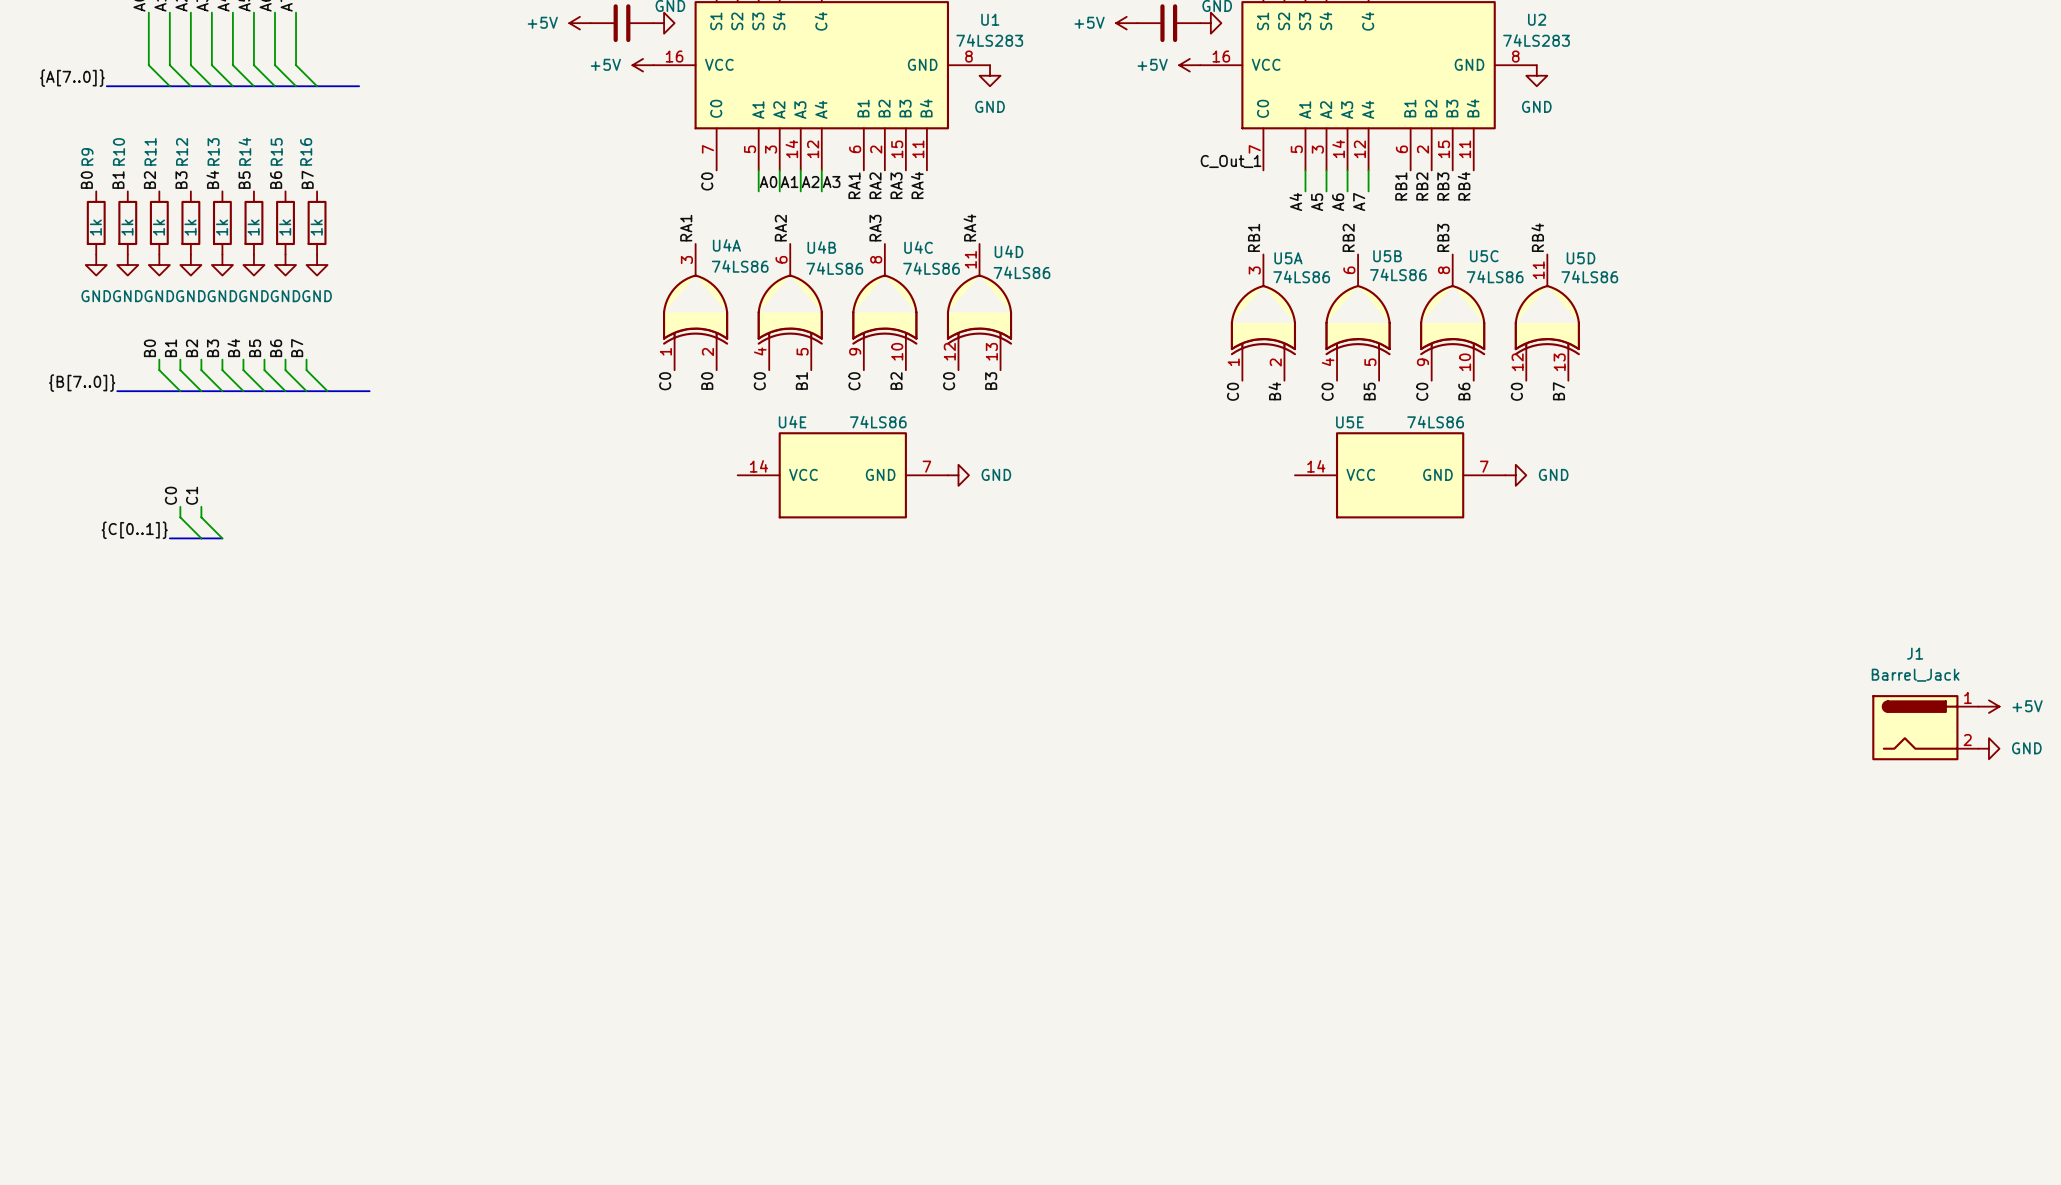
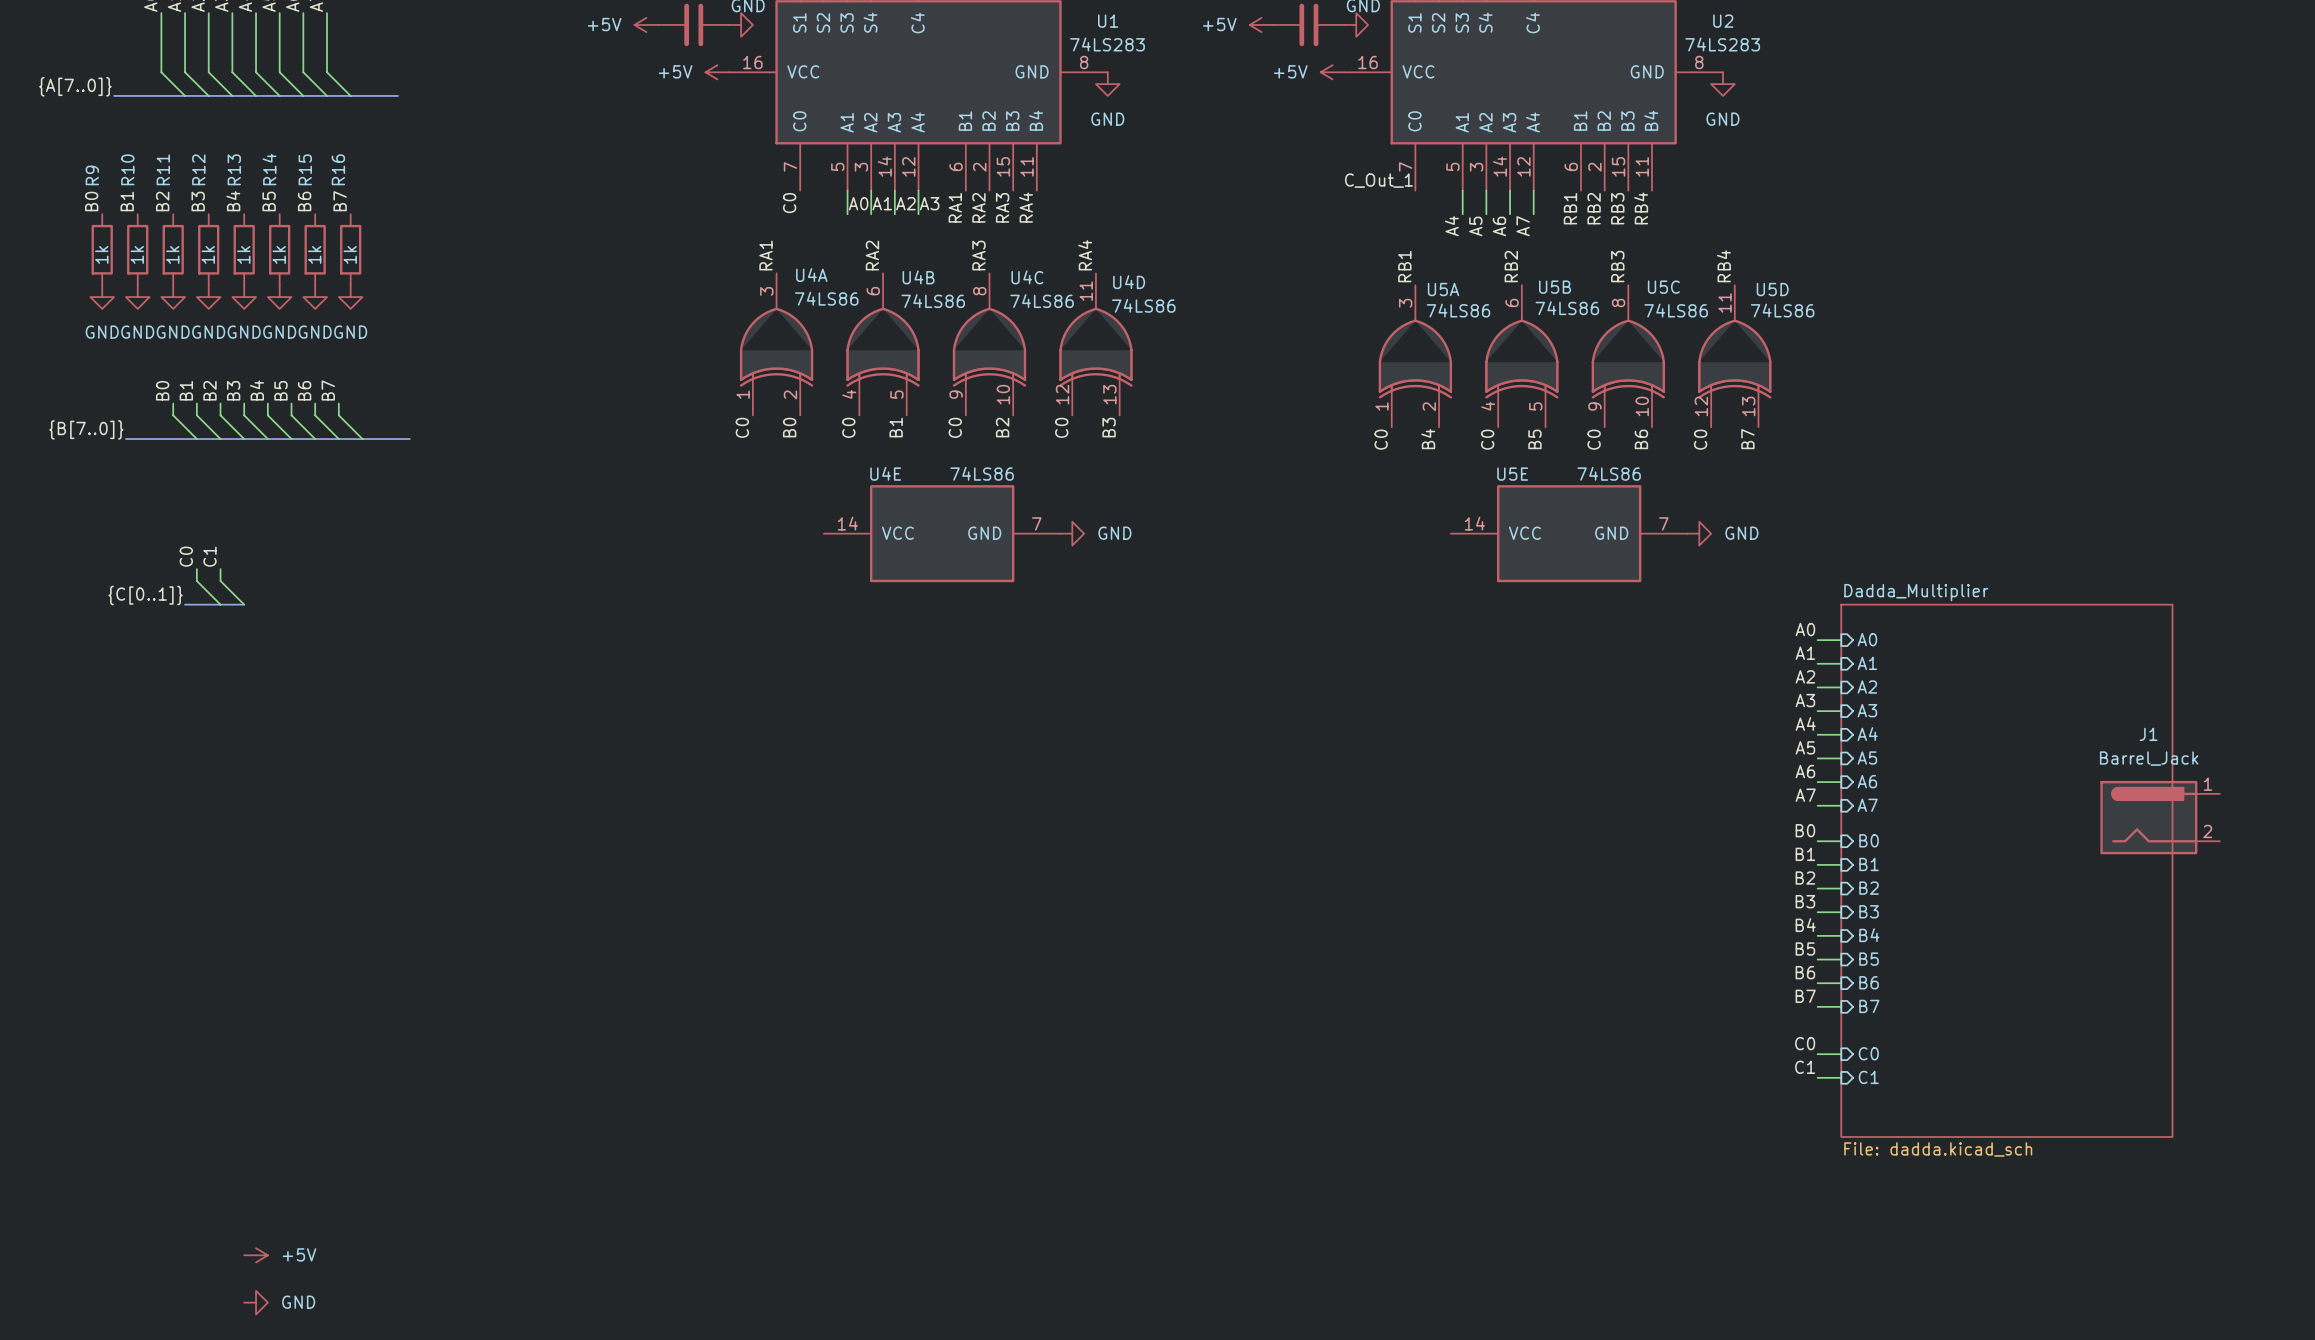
label: none -> A0 (1805, 629)
wire: none -> (1817, 640) (1841, 640)
sheet pin: none -> A0 (1867, 639)
label: none -> A1 (1805, 653)
wire: none -> (1817, 663) (1841, 663)
sheet pin: none -> A1 (1867, 663)
label: none -> A2 (1805, 676)
sheet pin: none -> A2 (1867, 687)
wire: none -> (1817, 687) (1841, 687)
label: none -> A3 (1805, 700)
sheet pin: none -> A3 (1867, 710)
wire: none -> (1817, 711) (1841, 711)
label: none -> A4 (1805, 723)
sheet pin: none -> A4 (1867, 734)
wire: none -> (1817, 734) (1841, 734)
label: none -> A5 (1805, 747)
sheet pin: none -> A5 (1867, 757)
wire: none -> (1817, 758) (1841, 758)
label: none -> A6 (1805, 771)
sheet pin: none -> A6 (1867, 781)
wire: none -> (1817, 782) (1841, 782)
power symbol: +5V (1988, 706) -> none
label: none -> A7 (1805, 795)
sheet pin: none -> A7 (1867, 805)
wire: none -> (1817, 805) (1841, 805)
label: none -> B0 (1805, 830)
wire: none -> (1817, 841) (1841, 841)
sheet pin: none -> B0 (1869, 840)
power symbol: GND (1988, 748) -> none
label: none -> B1 (1805, 854)
wire: none -> (1817, 864) (1841, 864)
sheet pin: none -> B1 (1869, 864)
sheet Dadda_Multiplier: none -> File: dadda.kicad_sch (2006, 870)
label: none -> B2 (1805, 878)
wire: none -> (1817, 888) (1841, 888)
sheet pin: none -> B2 (1869, 888)
label: none -> B3 (1805, 901)
wire: none -> (1817, 912) (1841, 912)
sheet pin: none -> B3 (1869, 911)
label: none -> B4 (1805, 925)
wire: none -> (1817, 935) (1841, 935)
sheet pin: none -> B4 (1869, 935)
label: none -> B5 (1805, 948)
wire: none -> (1817, 959) (1841, 959)
sheet pin: none -> B5 (1869, 959)
label: none -> B6 (1805, 972)
wire: none -> (1817, 983) (1841, 983)
sheet pin: none -> B6 (1869, 982)
label: none -> B7 (1805, 996)
wire: none -> (1817, 1006) (1841, 1006)
sheet pin: none -> B7 (1869, 1006)
label: none -> C0 (1805, 1043)
wire: none -> (1817, 1054) (1841, 1054)
sheet pin: none -> C0 (1868, 1053)
label: none -> C1 (1805, 1067)
sheet pin: none -> C1 (1868, 1077)
wire: none -> (1817, 1077) (1841, 1077)
power symbol: none -> +5V (256, 1255)
power symbol: none -> GND (256, 1302)

